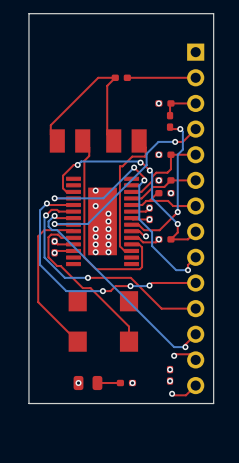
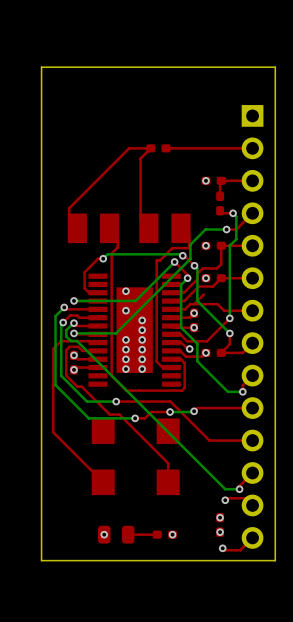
part: (164, 193) -> none
via: (170, 193) -> none

